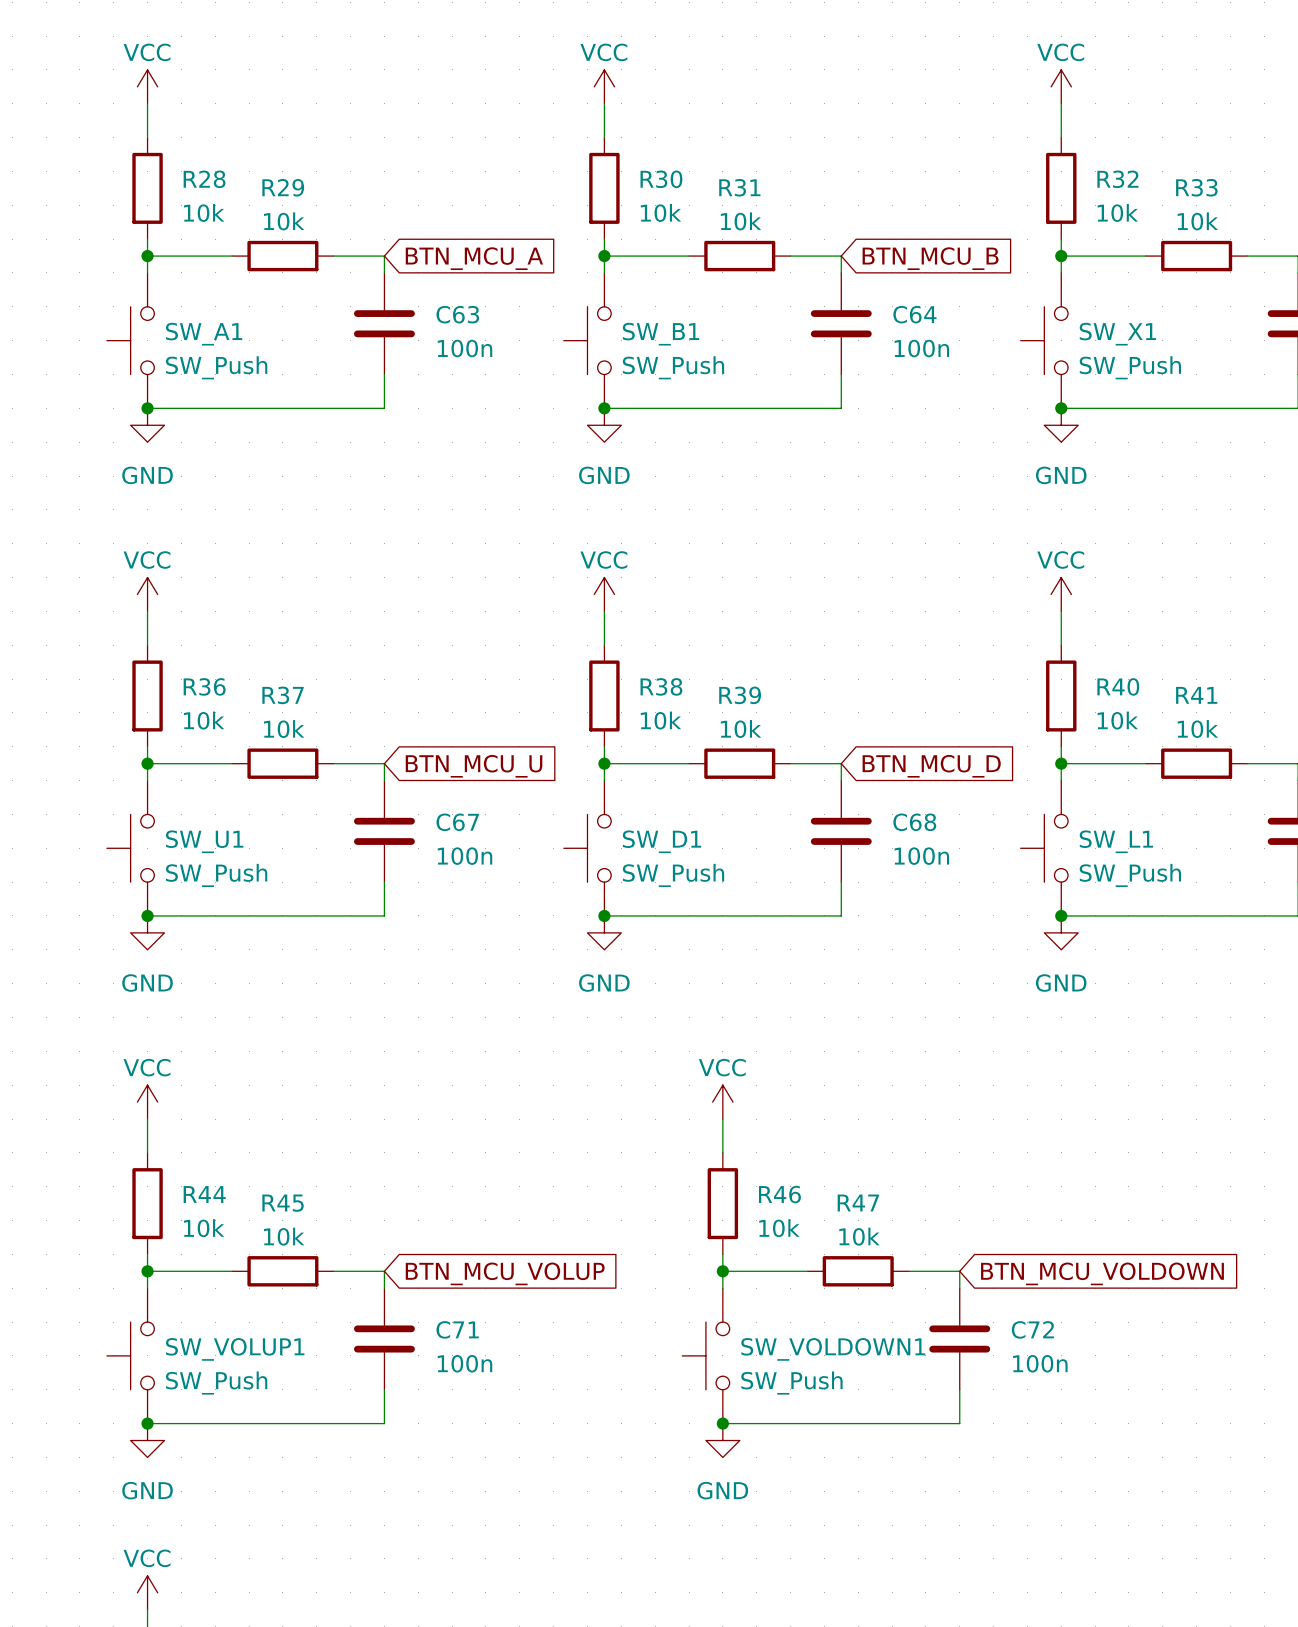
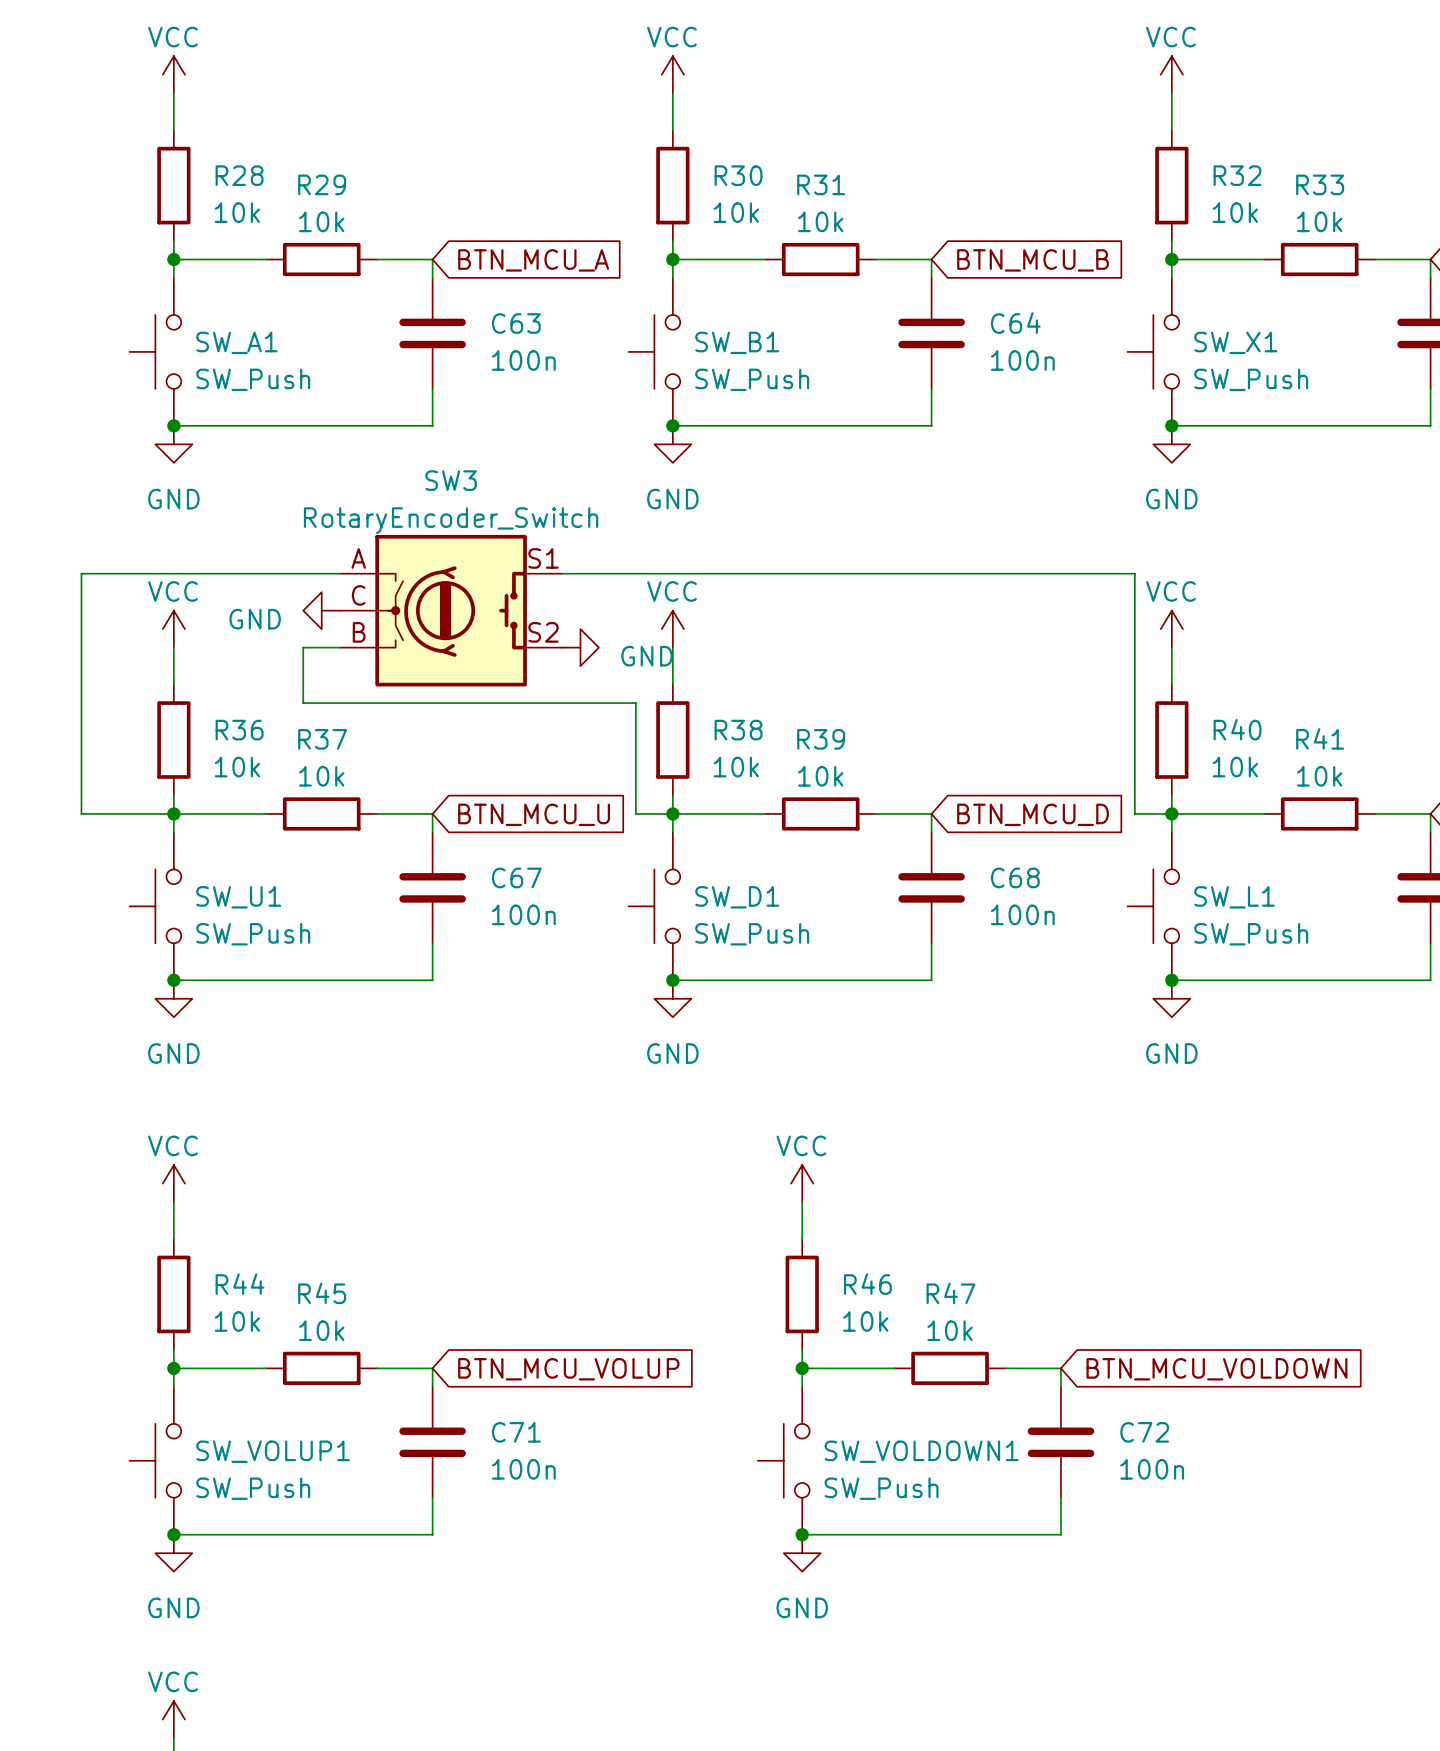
wire: none -> (340, 573) (81, 573) (81, 813) (173, 813)
wire: none -> (561, 573) (1134, 573) (1134, 813) (1171, 813)
power symbol: none -> GND (321, 610)
SW3: none -> RotaryEncoder_Switch (451, 610)
wire: none -> (340, 647) (303, 647) (303, 703) (635, 703) (635, 813) (672, 813)
power symbol: none -> GND (580, 647)

